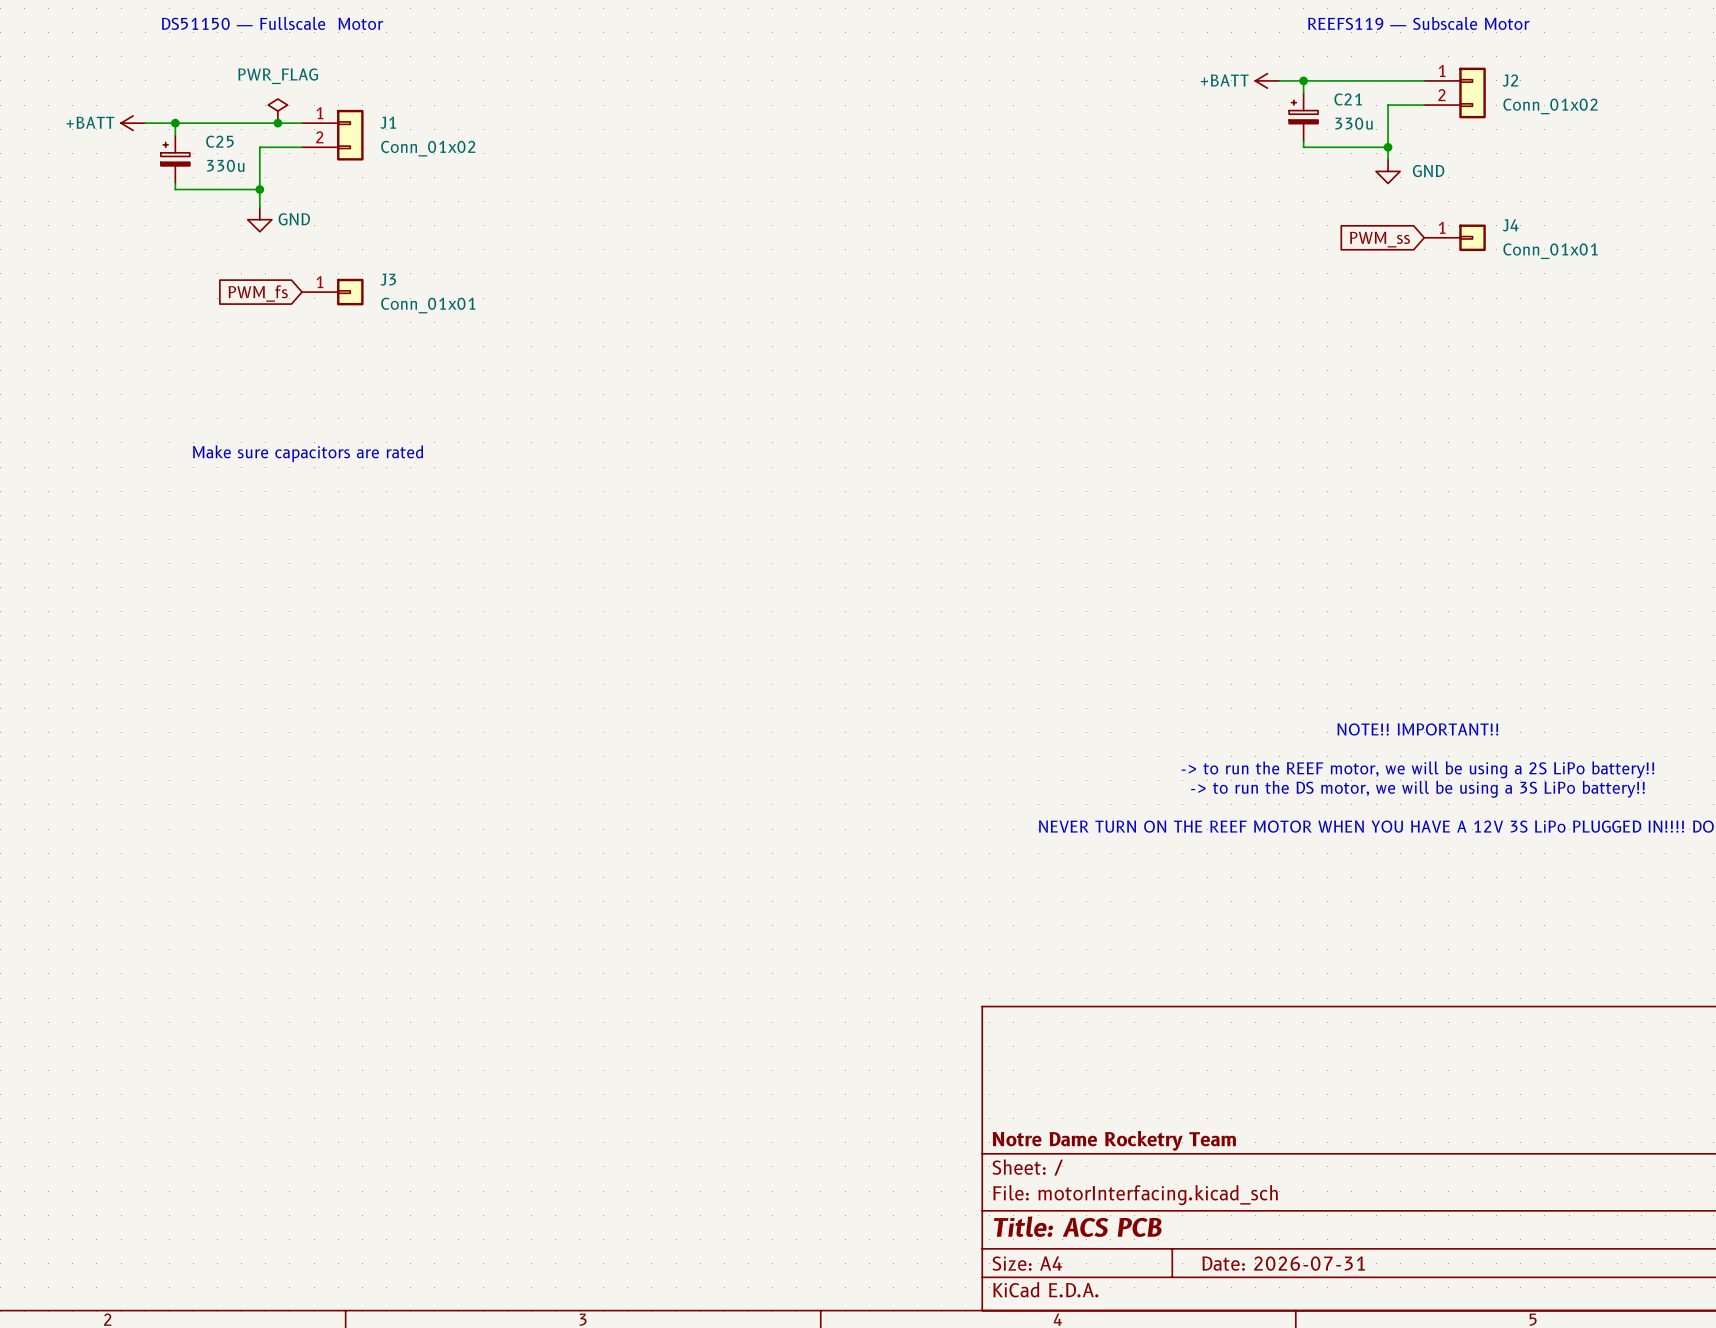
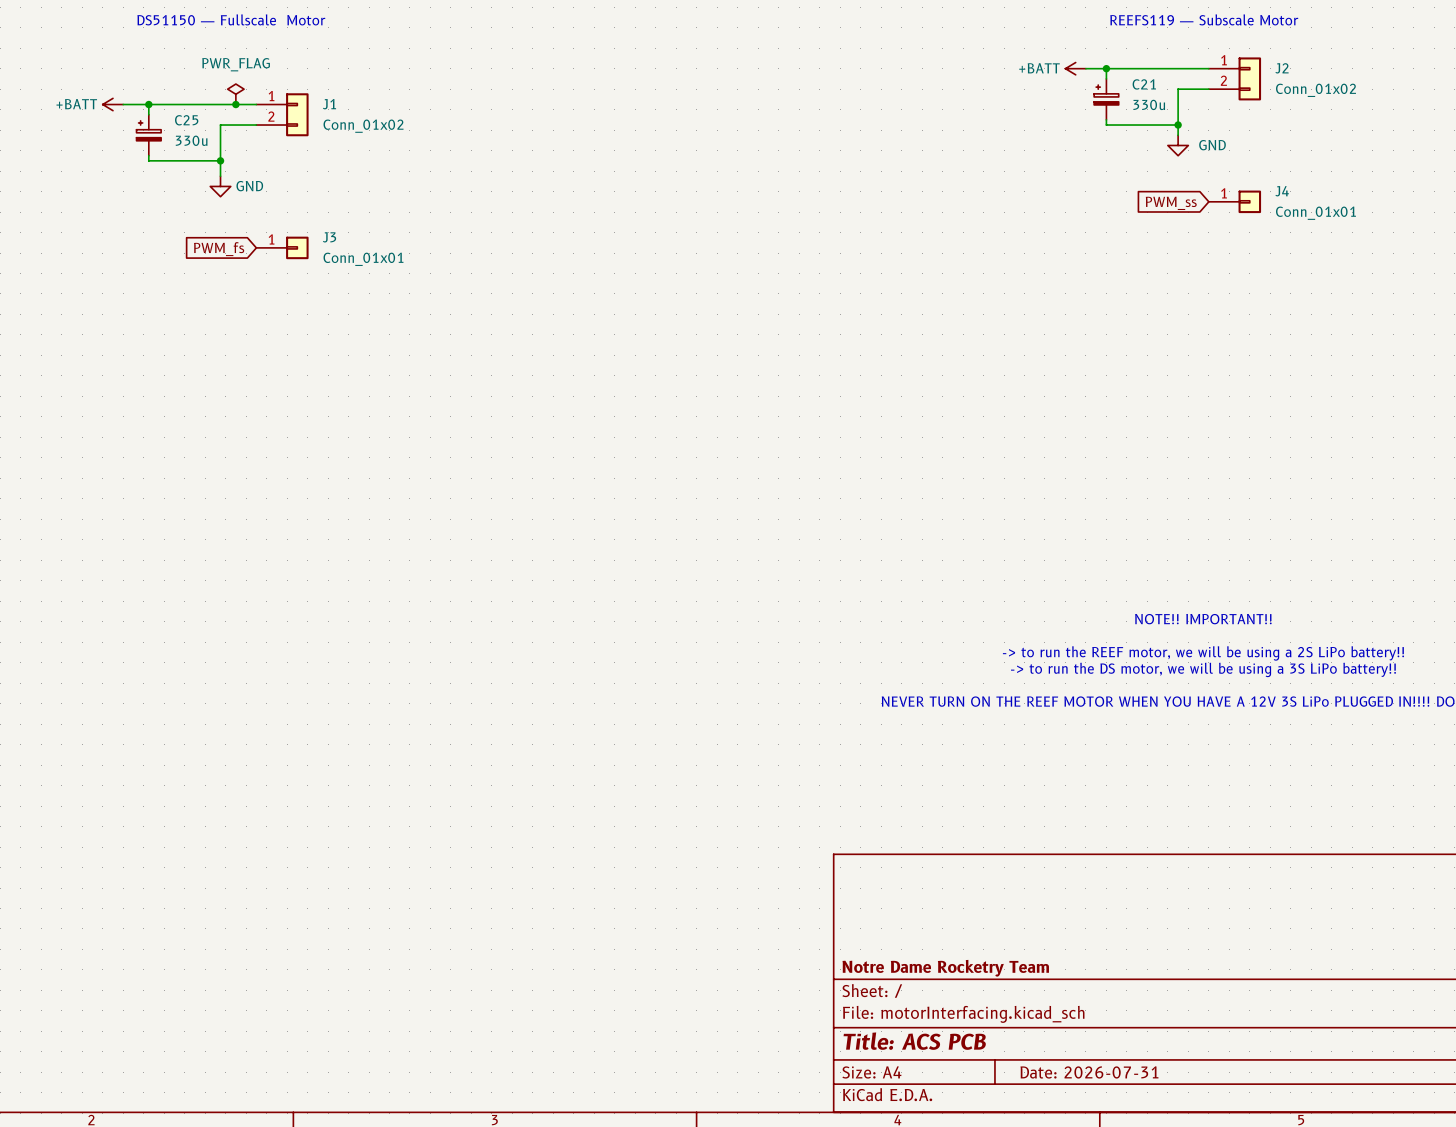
text: Make sure capacitors are rated (308, 453) -> none

